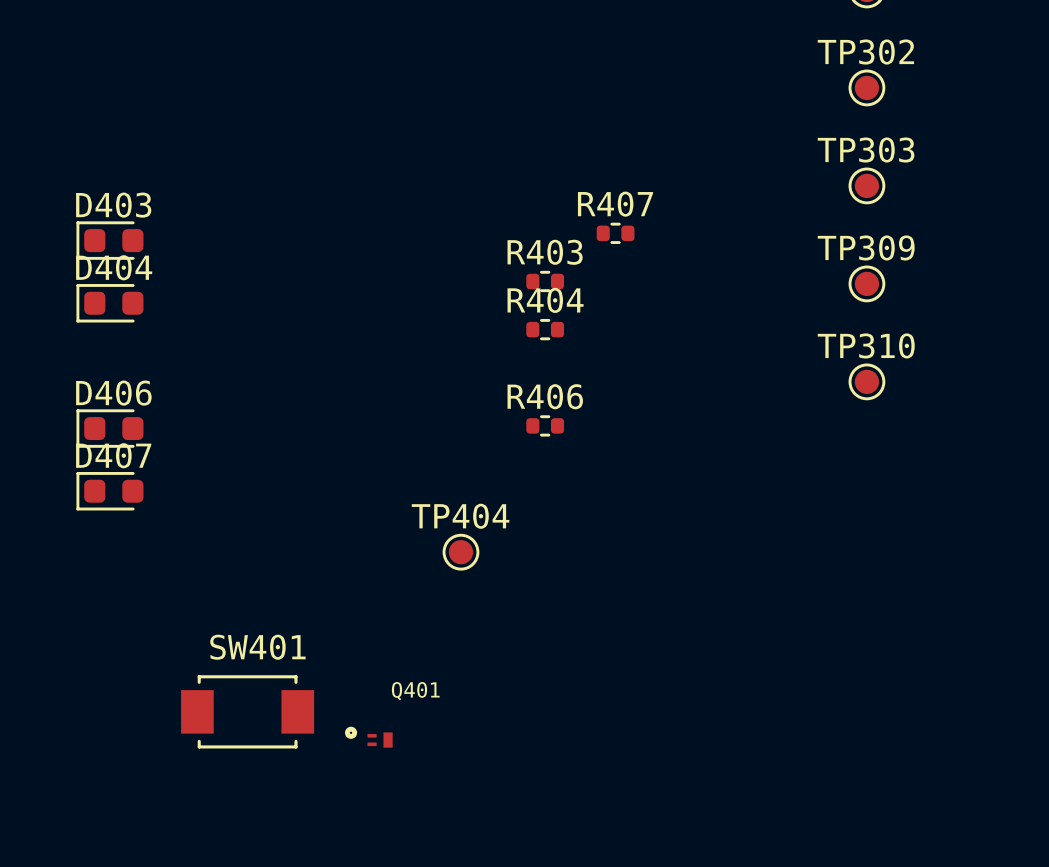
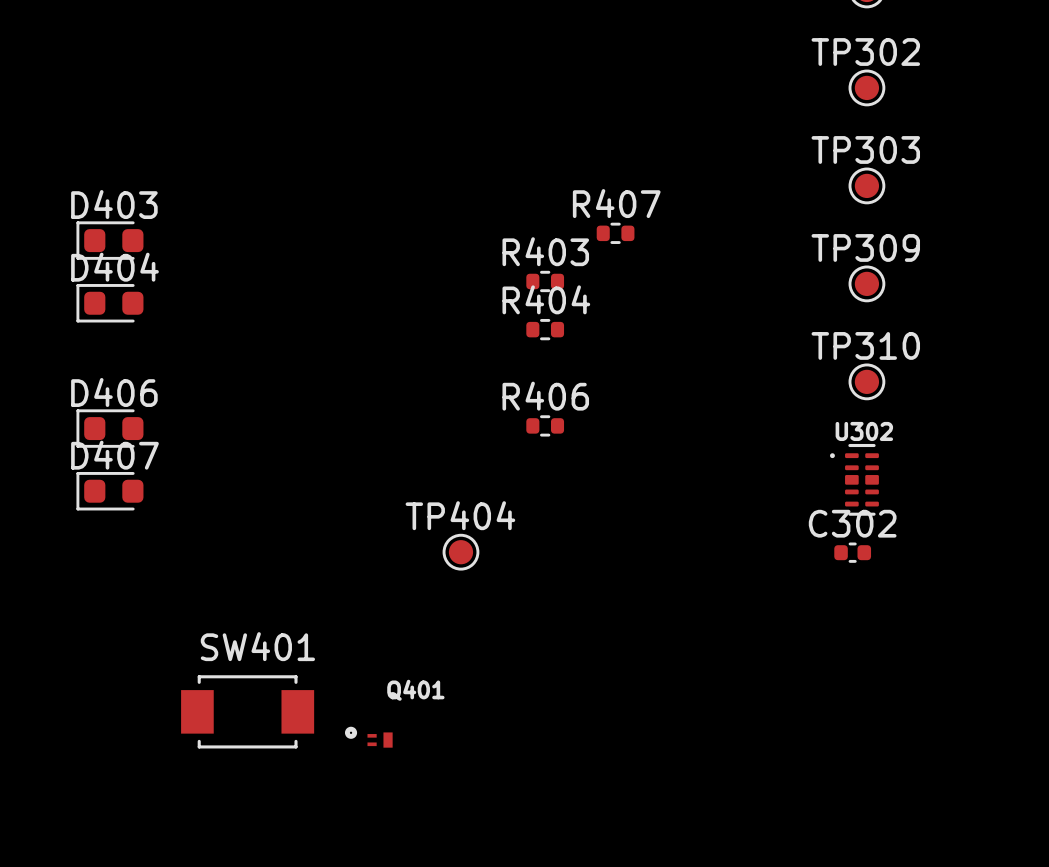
U302: none -> (854, 479)
C302: none -> (852, 552)

